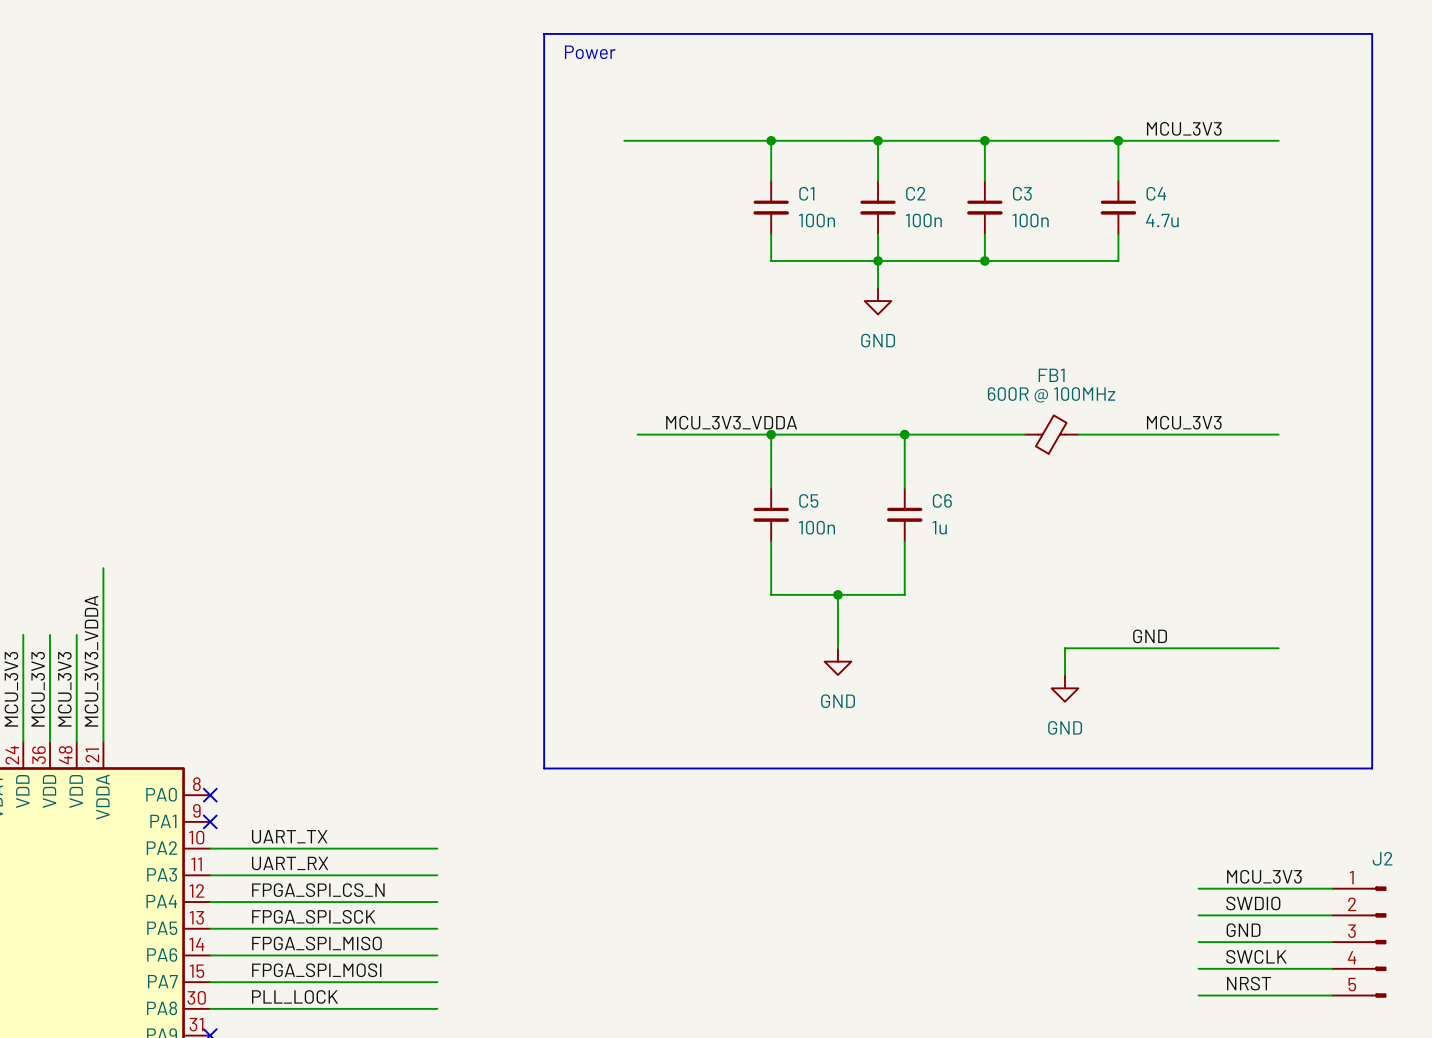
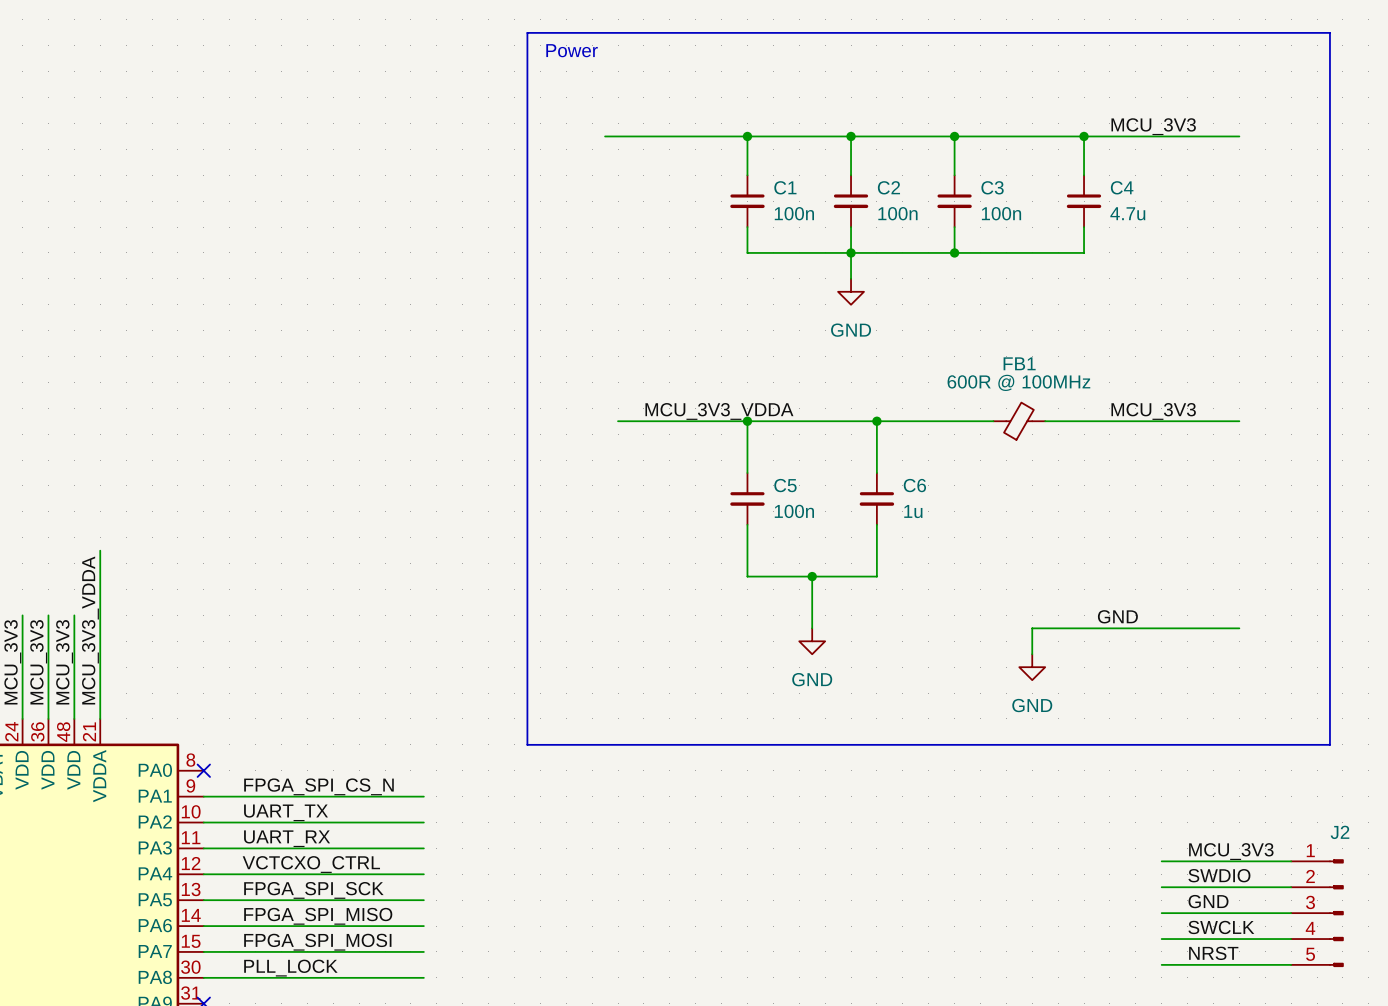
label: none -> FPGA_SPI_CS_N (318, 786)
wire: none -> (203, 796) (423, 796)
no-connect mark: (210, 821) -> none
label: FPGA_SPI_CS_N (318, 890) -> VCTCXO_CTRL (311, 864)

